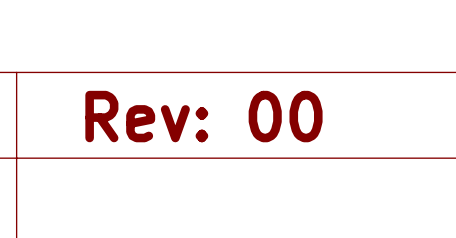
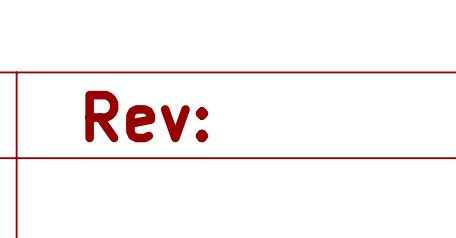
title block: Rev: 00 (203, 116) -> Rev: (146, 116)

